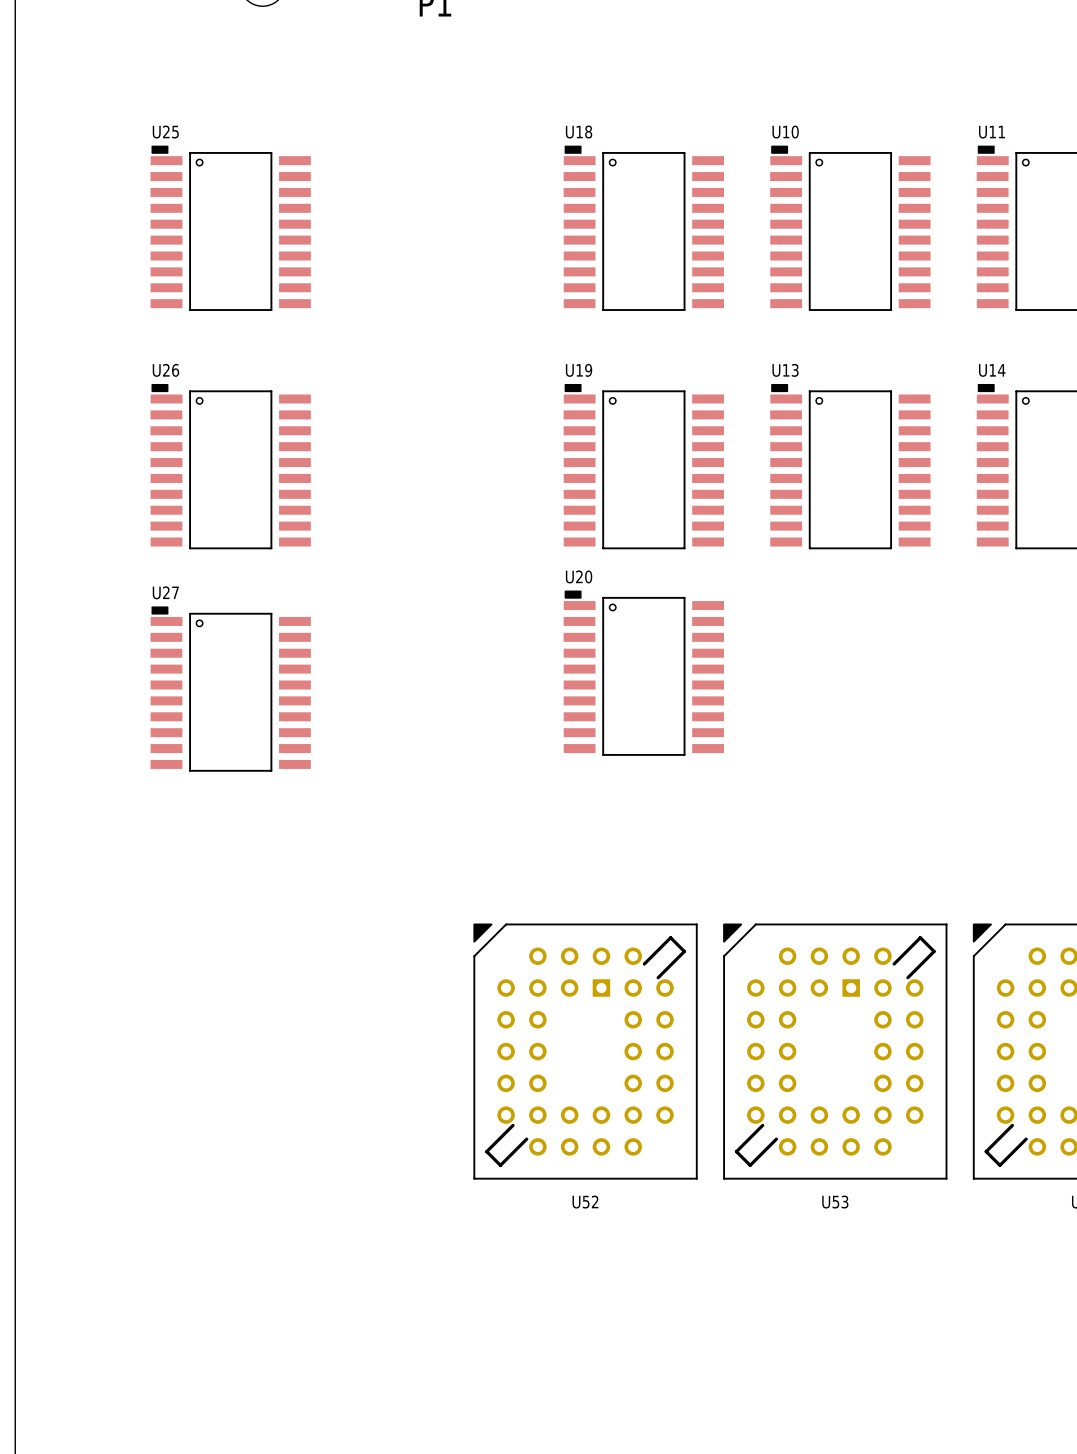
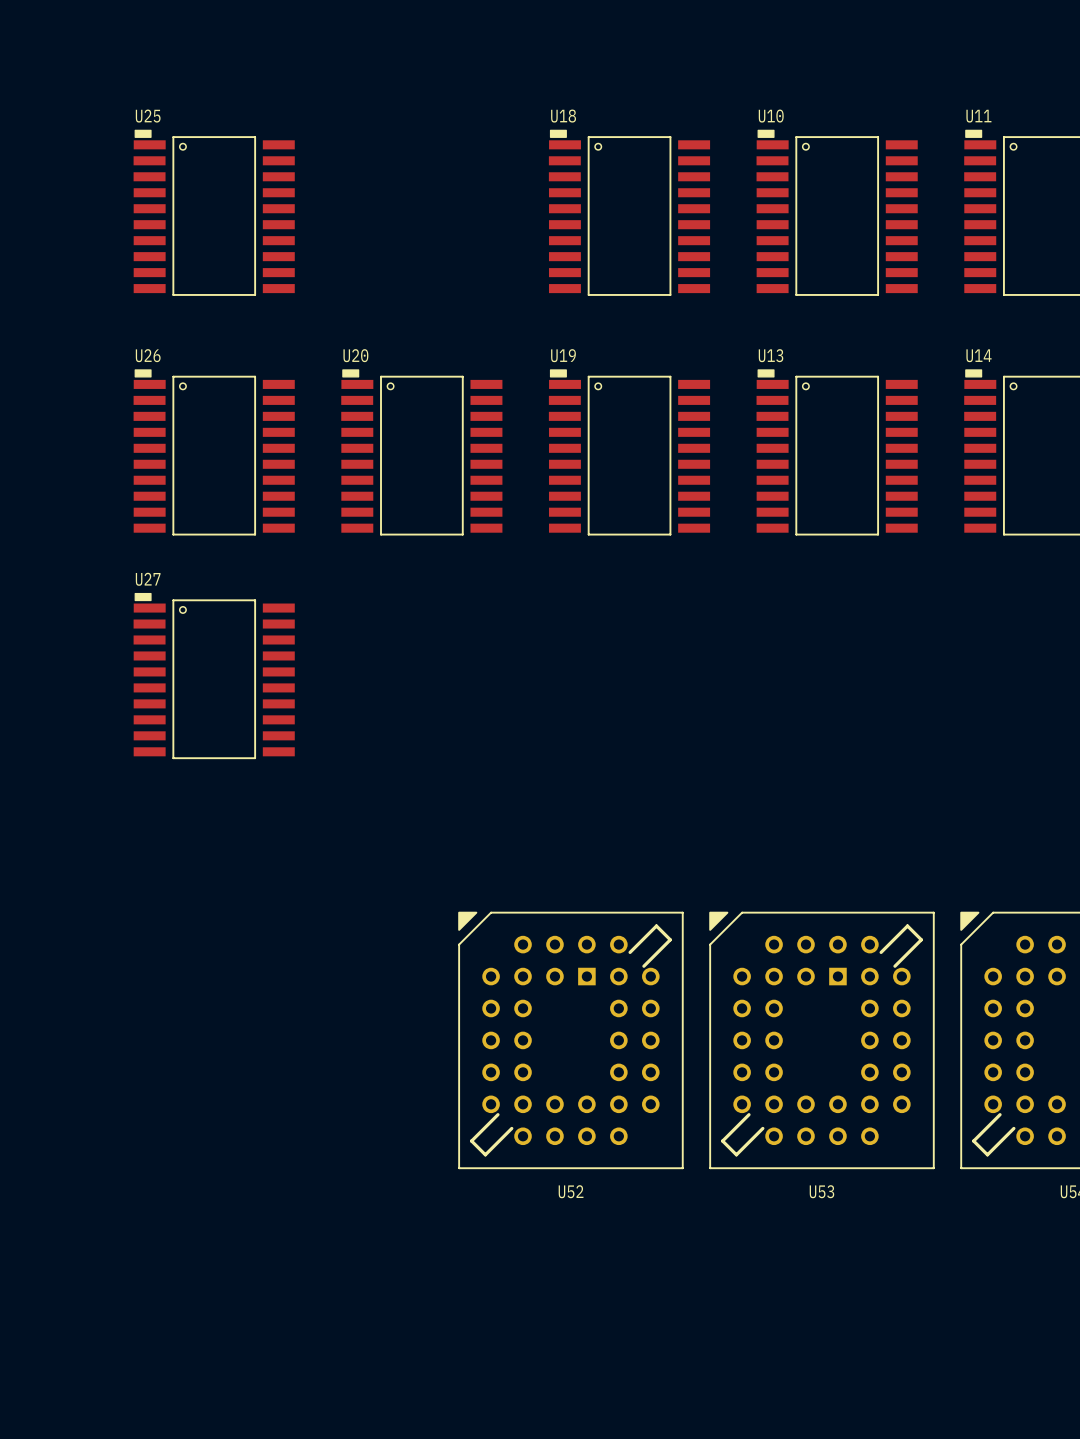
U20 position: (643, 673) -> (421, 452)

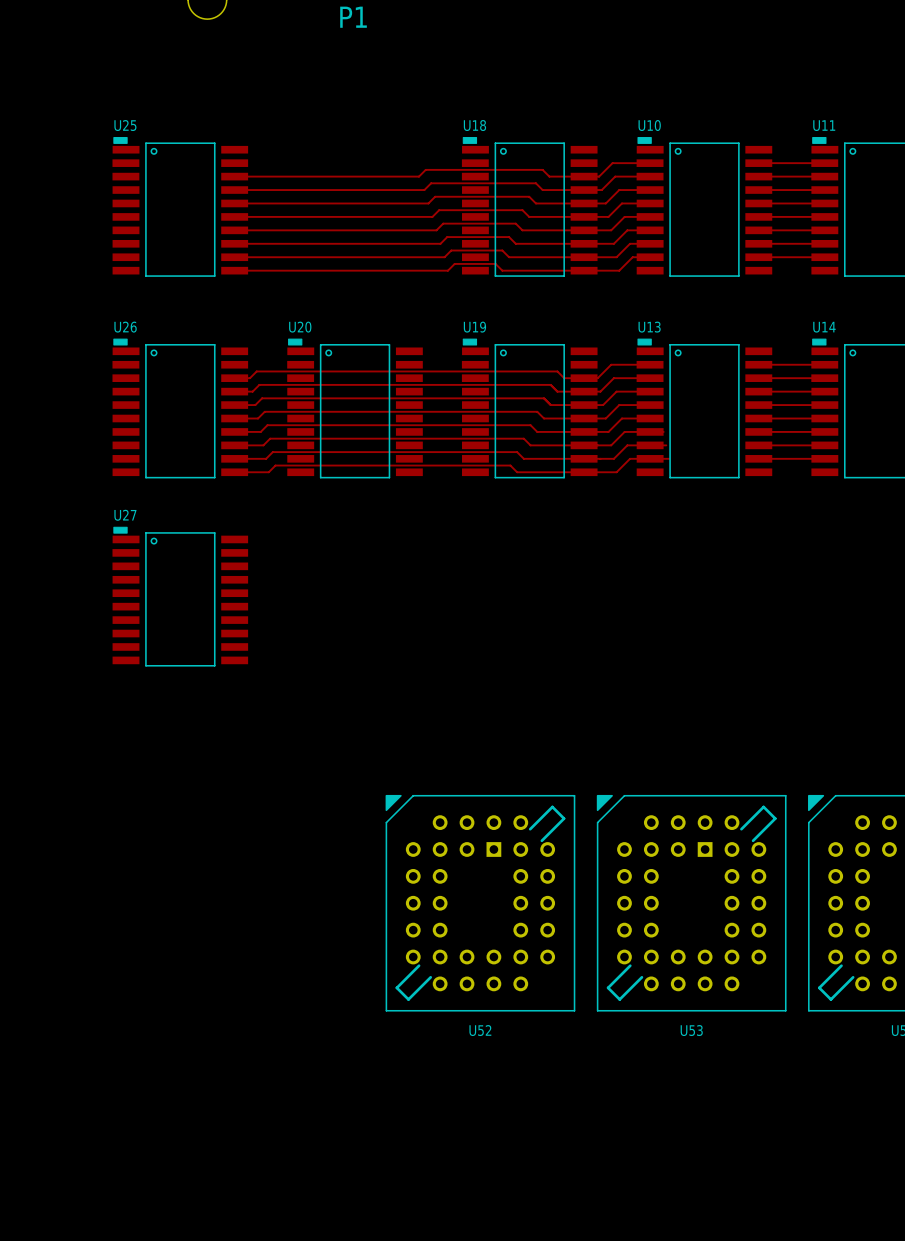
track: none -> (650, 163) (612, 163) (599, 176) (549, 176) (542, 169) (425, 169) (419, 176) (234, 176)
track: none -> (758, 163) (824, 163)
track: none -> (650, 176) (615, 176) (601, 190) (542, 190) (535, 183) (431, 183) (424, 190) (234, 190)
track: none -> (758, 176) (824, 176)
track: none -> (650, 190) (619, 190) (605, 203) (535, 203) (529, 196) (435, 196) (428, 203) (234, 203)
track: none -> (758, 190) (824, 190)
track: none -> (650, 203) (621, 203) (608, 216) (529, 216) (522, 210) (439, 210) (432, 216) (234, 216)
track: none -> (758, 203) (824, 203)
track: none -> (650, 216) (624, 216) (611, 230) (522, 230) (515, 223) (443, 223) (436, 230) (234, 230)
track: none -> (758, 216) (824, 216)
track: none -> (650, 230) (627, 230) (613, 243) (515, 243) (509, 237) (447, 237) (440, 243) (234, 243)
track: none -> (758, 230) (824, 230)
track: none -> (650, 243) (630, 243) (616, 257) (509, 257) (502, 250) (451, 250) (444, 257) (234, 257)
track: none -> (758, 243) (824, 243)
track: none -> (650, 257) (632, 257) (619, 270) (502, 270) (495, 263) (454, 263) (447, 270) (234, 270)
track: none -> (758, 257) (824, 257)
track: none -> (650, 364) (611, 364) (597, 378) (564, 378) (557, 371) (256, 371) (249, 378) (234, 378)
track: none -> (758, 364) (824, 364)
track: none -> (652, 378) (613, 378) (600, 391) (557, 391) (550, 384) (259, 384) (252, 391) (237, 391)
track: none -> (758, 378) (824, 378)
track: none -> (655, 391) (616, 391) (603, 405) (550, 405) (544, 398) (262, 398) (255, 405) (240, 405)
track: none -> (758, 391) (824, 391)
track: none -> (658, 405) (619, 405) (605, 418) (544, 418) (537, 411) (264, 411) (258, 418) (242, 418)
track: none -> (758, 405) (824, 405)
track: none -> (660, 418) (621, 418) (608, 431) (537, 431) (530, 425) (267, 425) (260, 431) (245, 431)
track: none -> (758, 418) (824, 418)
track: none -> (663, 431) (624, 431) (611, 445) (530, 445) (523, 438) (270, 438) (263, 445) (248, 445)
track: none -> (758, 431) (824, 431)
track: none -> (666, 445) (627, 445) (613, 458) (523, 458) (517, 452) (272, 452) (266, 458) (234, 458)
track: none -> (758, 445) (824, 445)
track: none -> (669, 458) (630, 458) (616, 472) (584, 472)
track: none -> (758, 458) (824, 458)
track: none -> (237, 472) (268, 472) (275, 465) (510, 465) (517, 472) (582, 472)

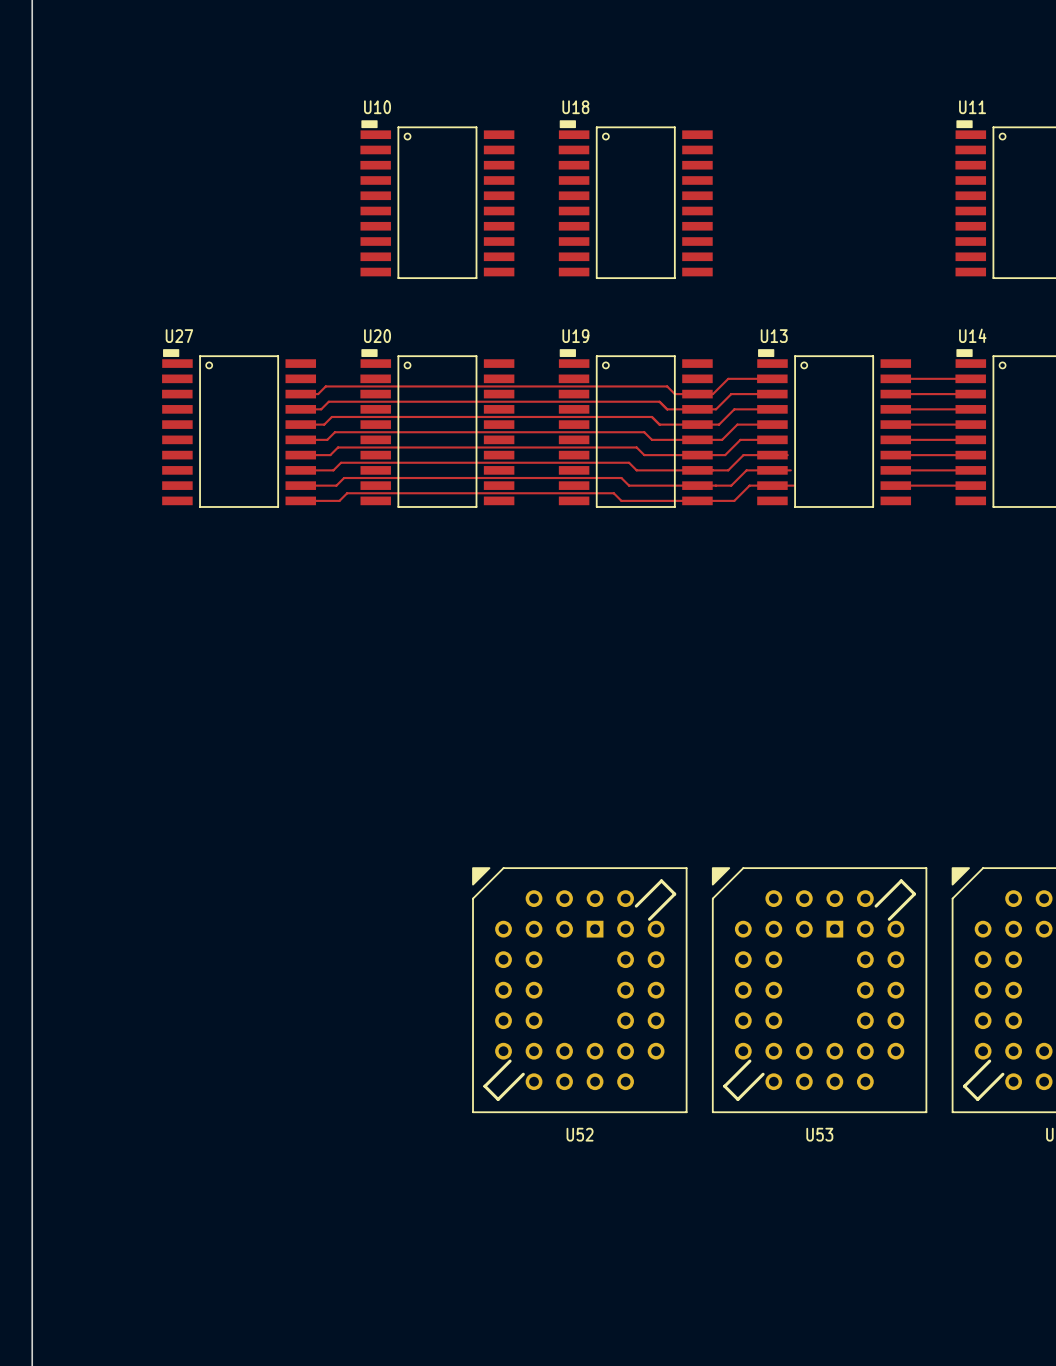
track: (650, 163) (612, 163) (599, 176) (549, 176) (542, 169) (425, 169) (419, 176) (234, 176) -> none
track: (758, 163) (824, 163) -> none
track: (650, 176) (615, 176) (601, 190) (542, 190) (535, 183) (431, 183) (424, 190) (234, 190) -> none
track: (758, 176) (824, 176) -> none
track: (650, 190) (619, 190) (605, 203) (535, 203) (529, 196) (435, 196) (428, 203) (234, 203) -> none
track: (758, 190) (824, 190) -> none
track: (650, 203) (621, 203) (608, 216) (529, 216) (522, 210) (439, 210) (432, 216) (234, 216) -> none
track: (758, 203) (824, 203) -> none
U25: (180, 206) -> none
U10 position: (704, 206) -> (437, 199)
track: (650, 216) (624, 216) (611, 230) (522, 230) (515, 223) (443, 223) (436, 230) (234, 230) -> none
track: (758, 216) (824, 216) -> none
track: (650, 230) (627, 230) (613, 243) (515, 243) (509, 237) (447, 237) (440, 243) (234, 243) -> none
track: (758, 230) (824, 230) -> none
track: (650, 243) (630, 243) (616, 257) (509, 257) (502, 250) (451, 250) (444, 257) (234, 257) -> none
track: (758, 243) (824, 243) -> none
track: (650, 257) (632, 257) (619, 270) (502, 270) (495, 263) (454, 263) (447, 270) (234, 270) -> none
track: (758, 257) (824, 257) -> none
U26 name: U26 (125, 327) -> U27 (179, 336)
U27: (180, 596) -> none

